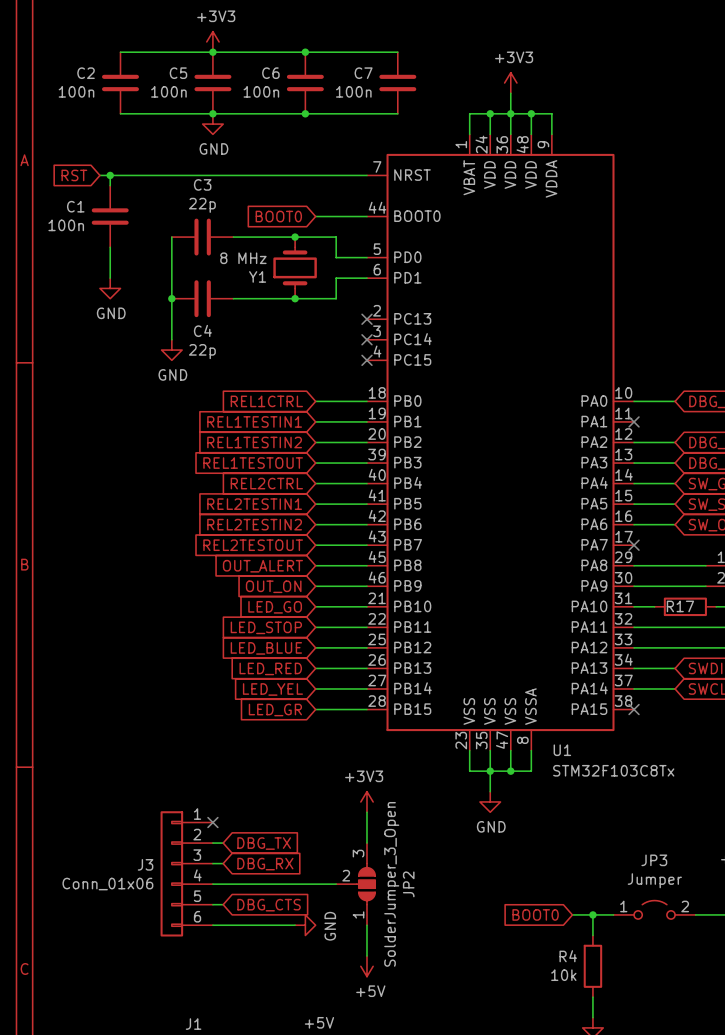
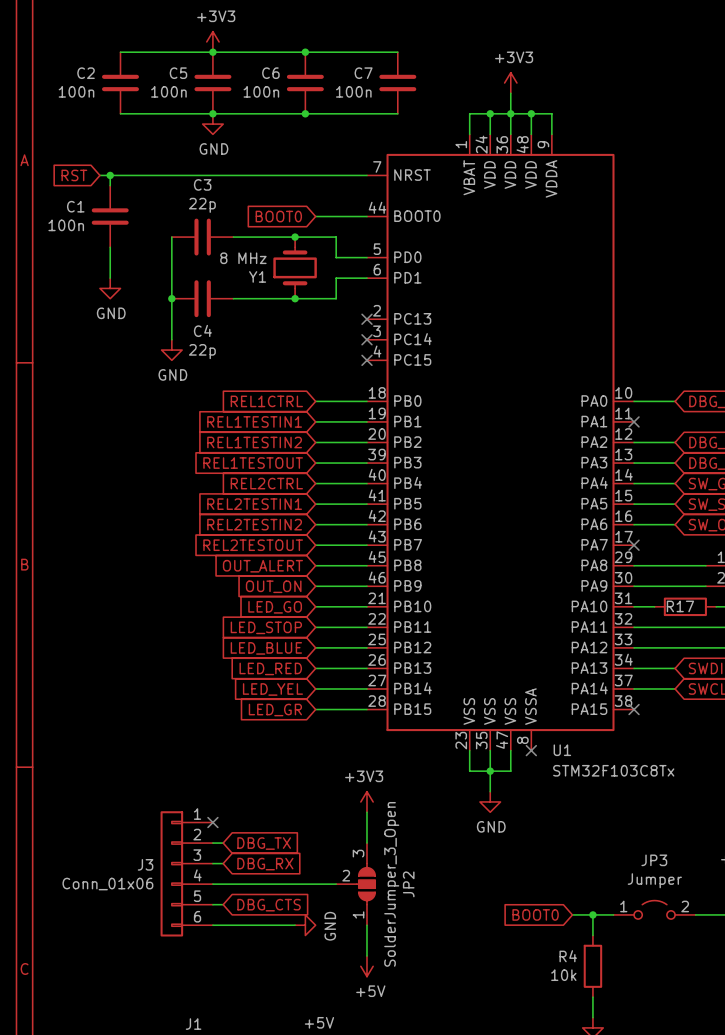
wire: (531, 750) (531, 771) (510, 771) -> none
no-connect mark: none -> (531, 750)
junction: (510, 771) -> none

